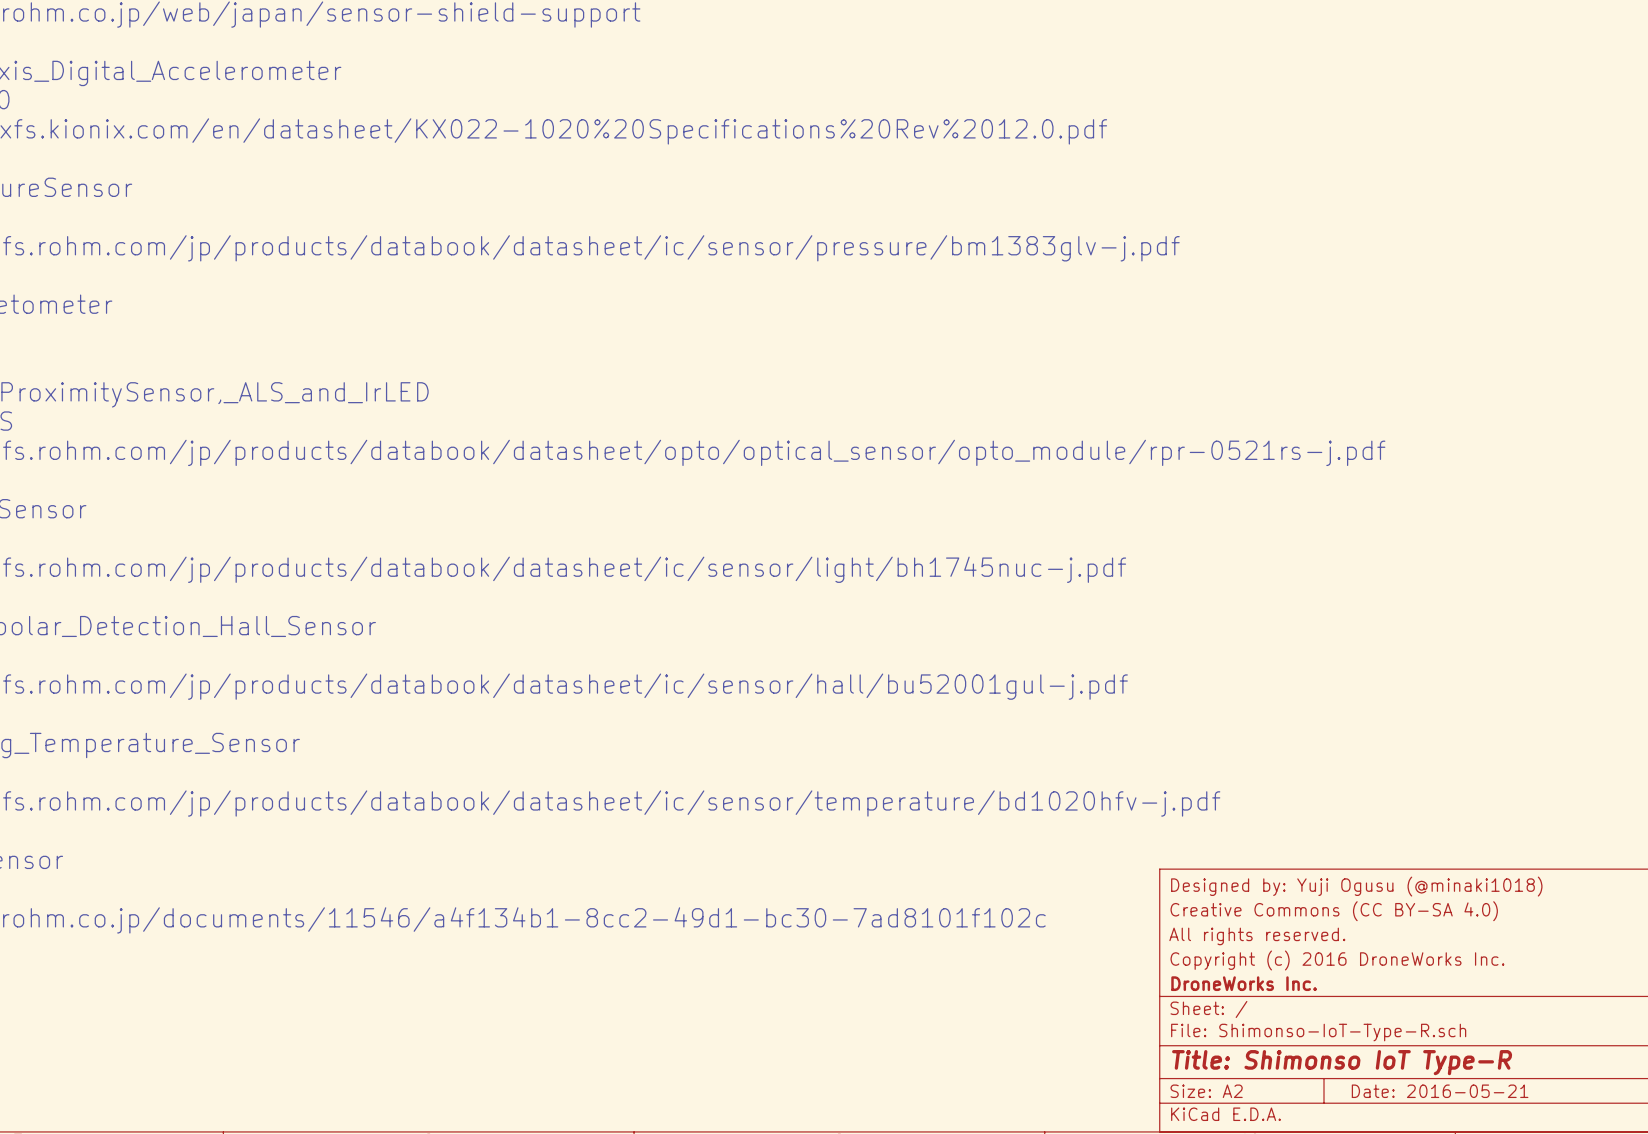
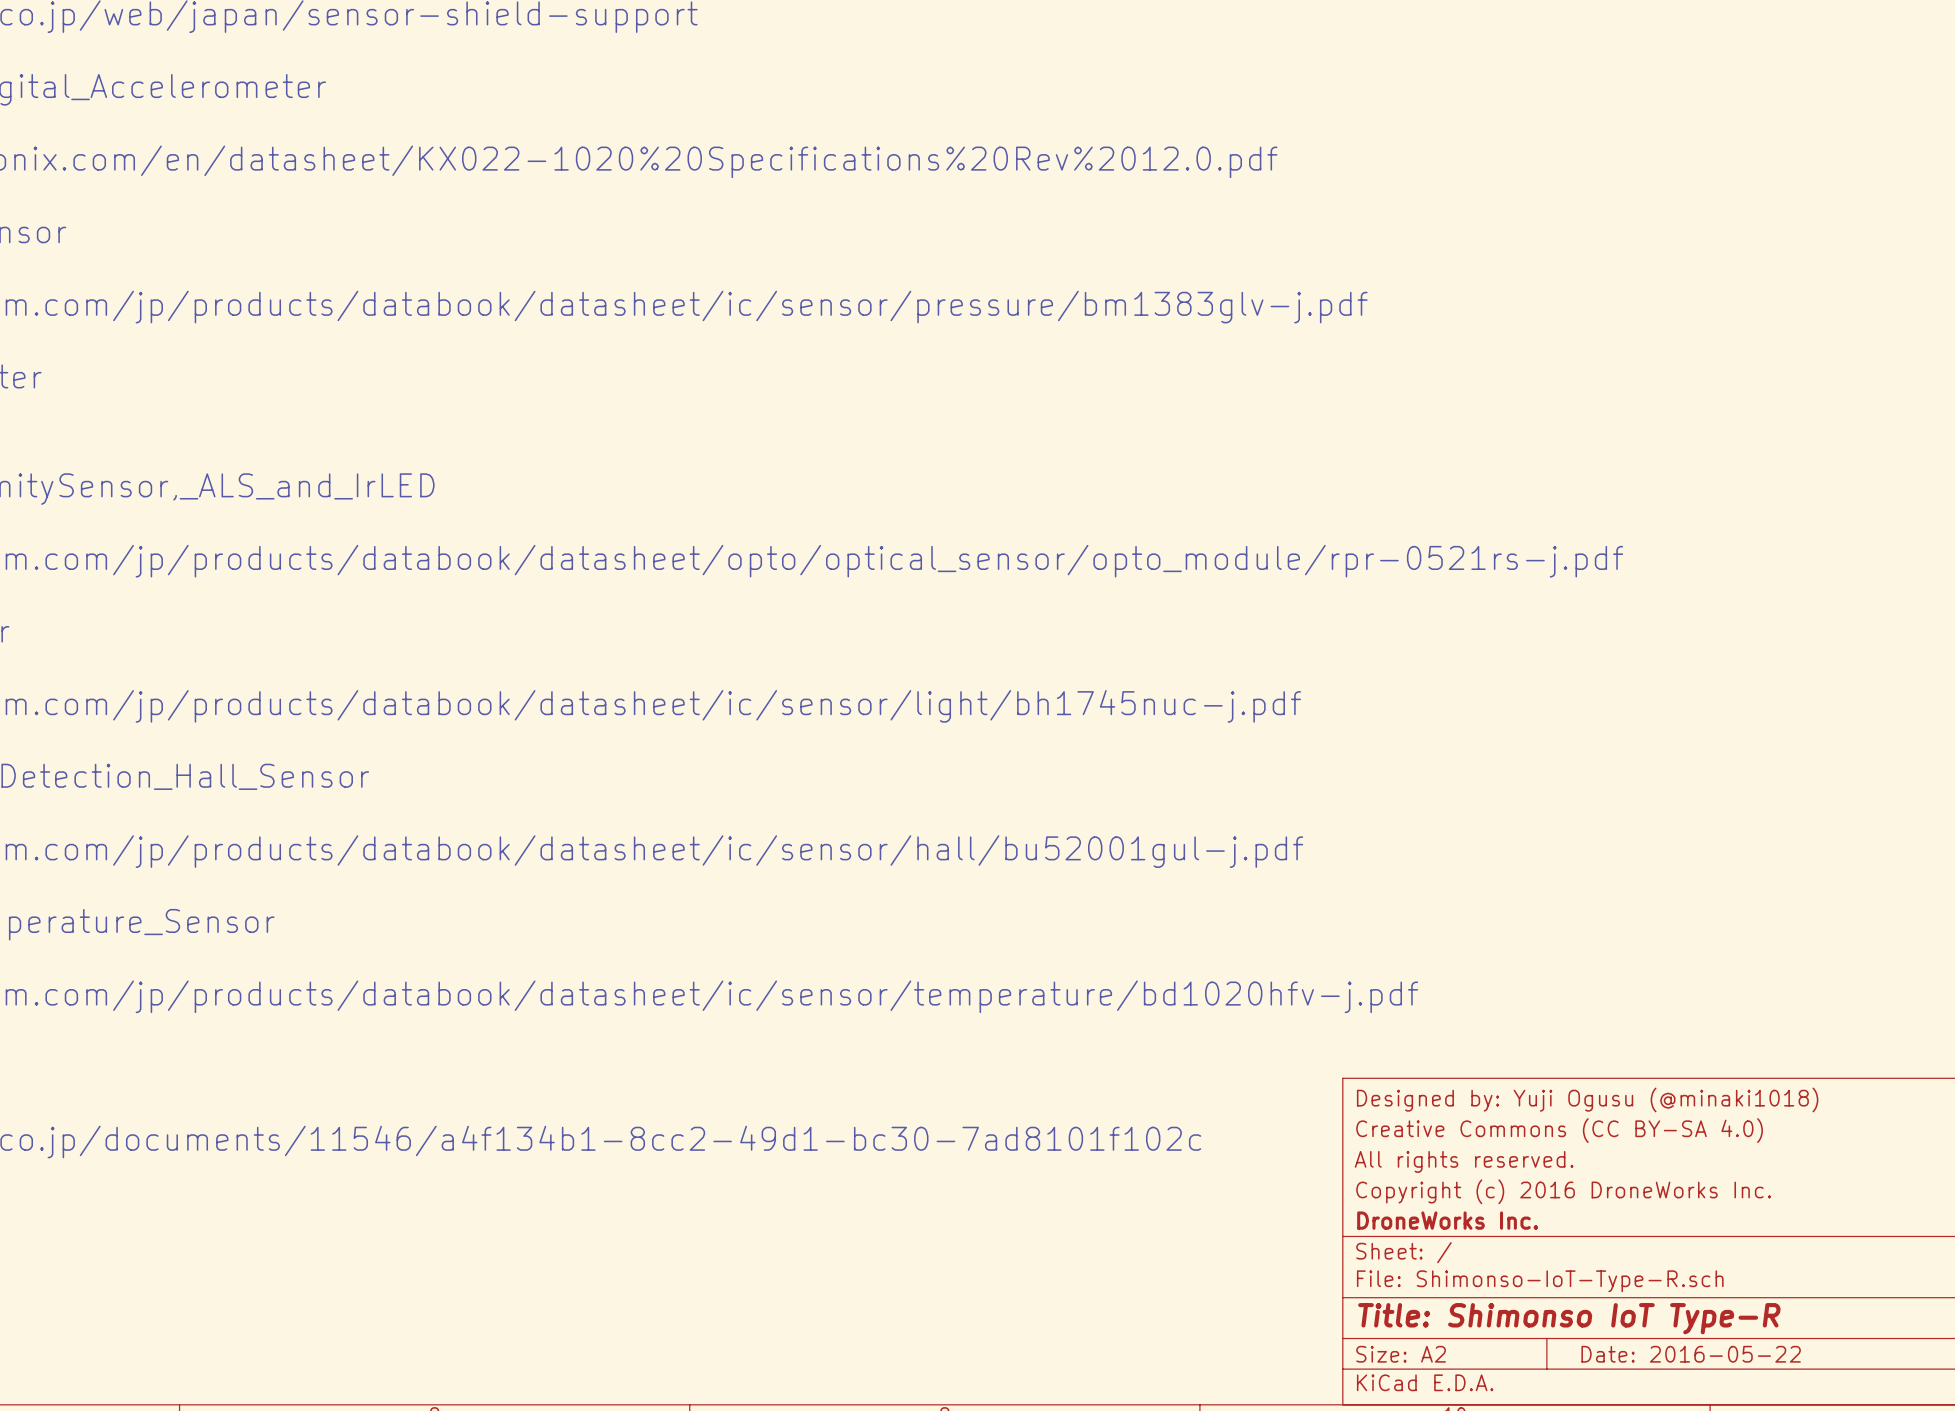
title block: Date: 2016-05-21 (1440, 1091) -> Date: 2016-05-22 (1691, 1354)

